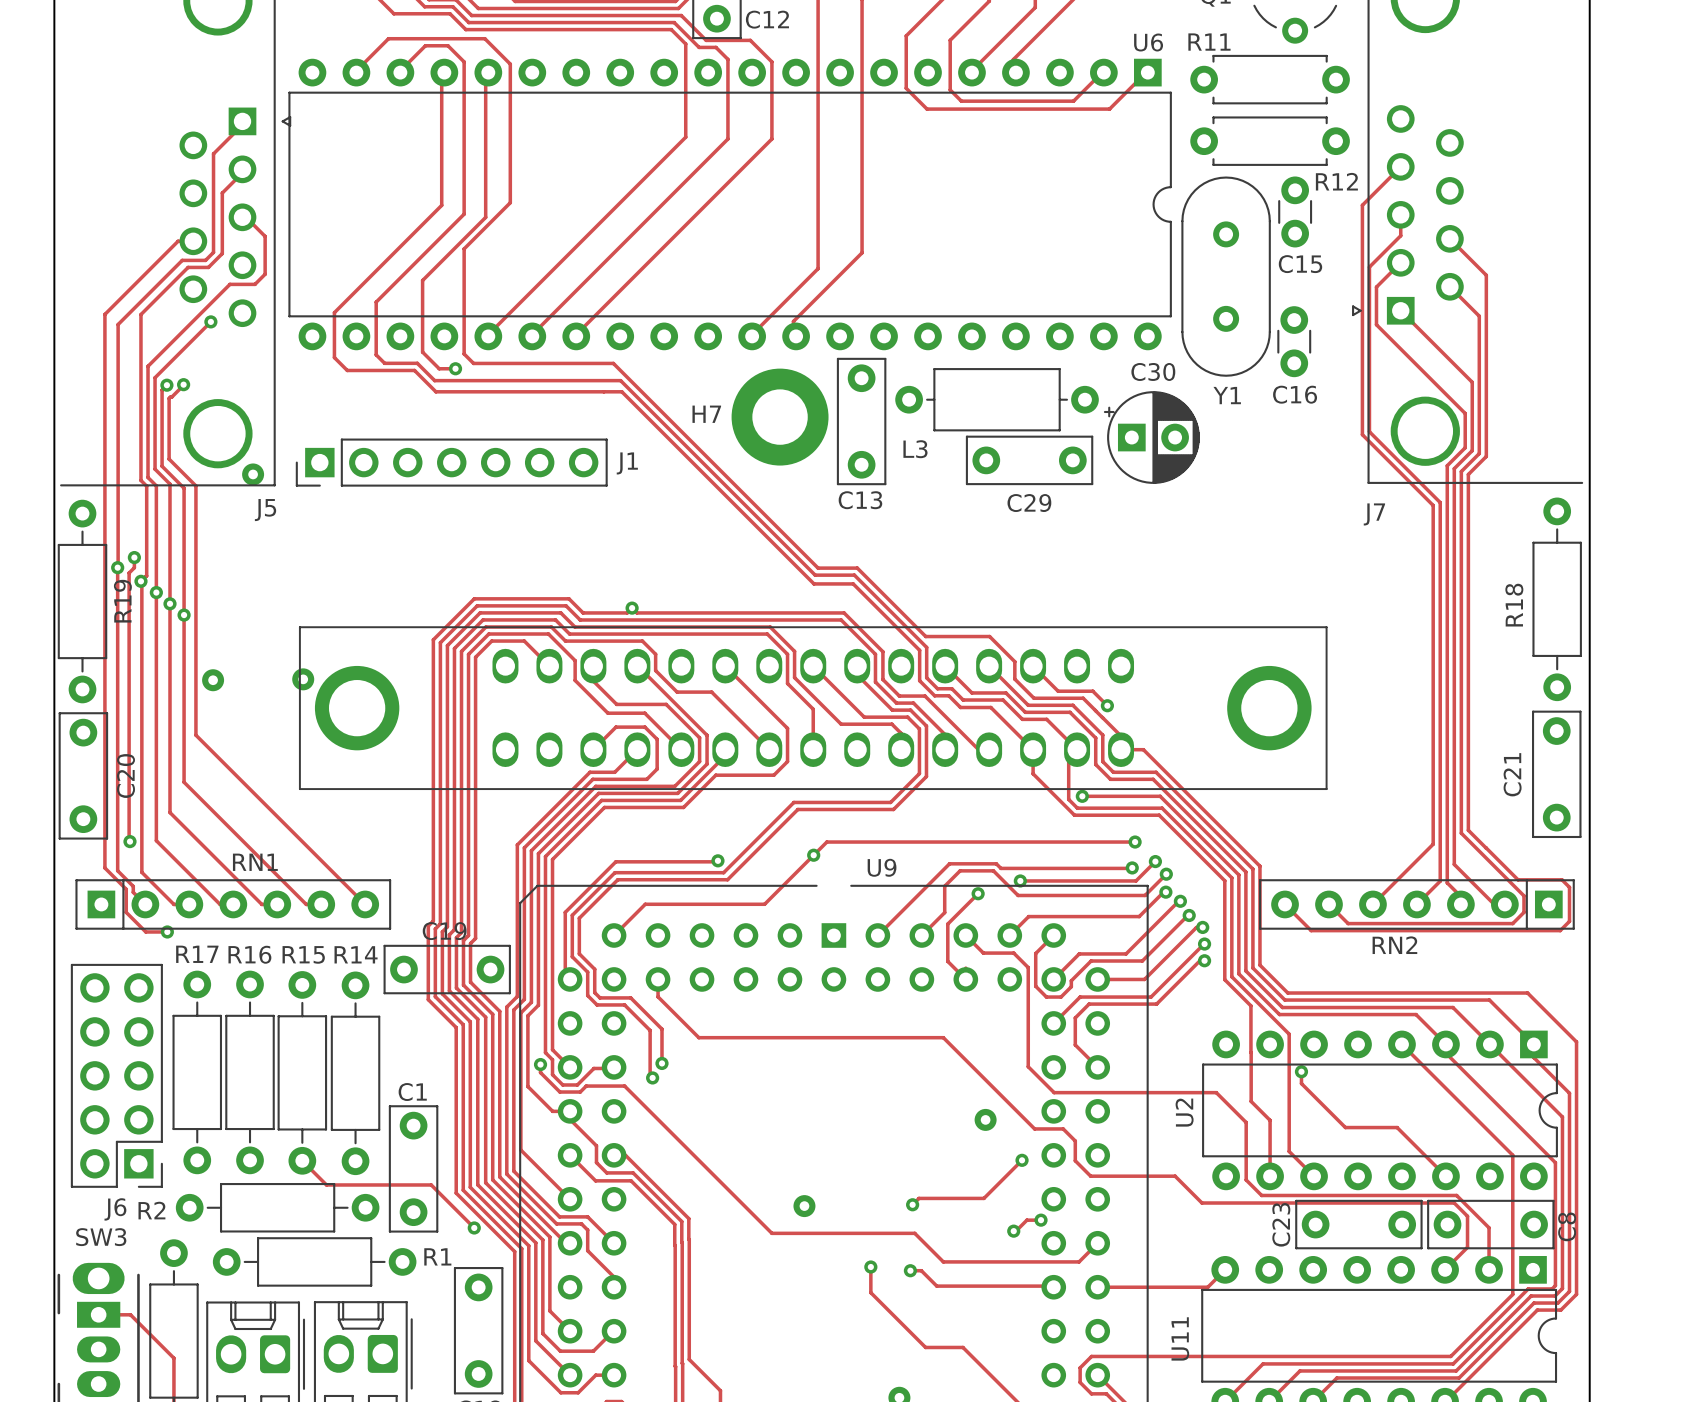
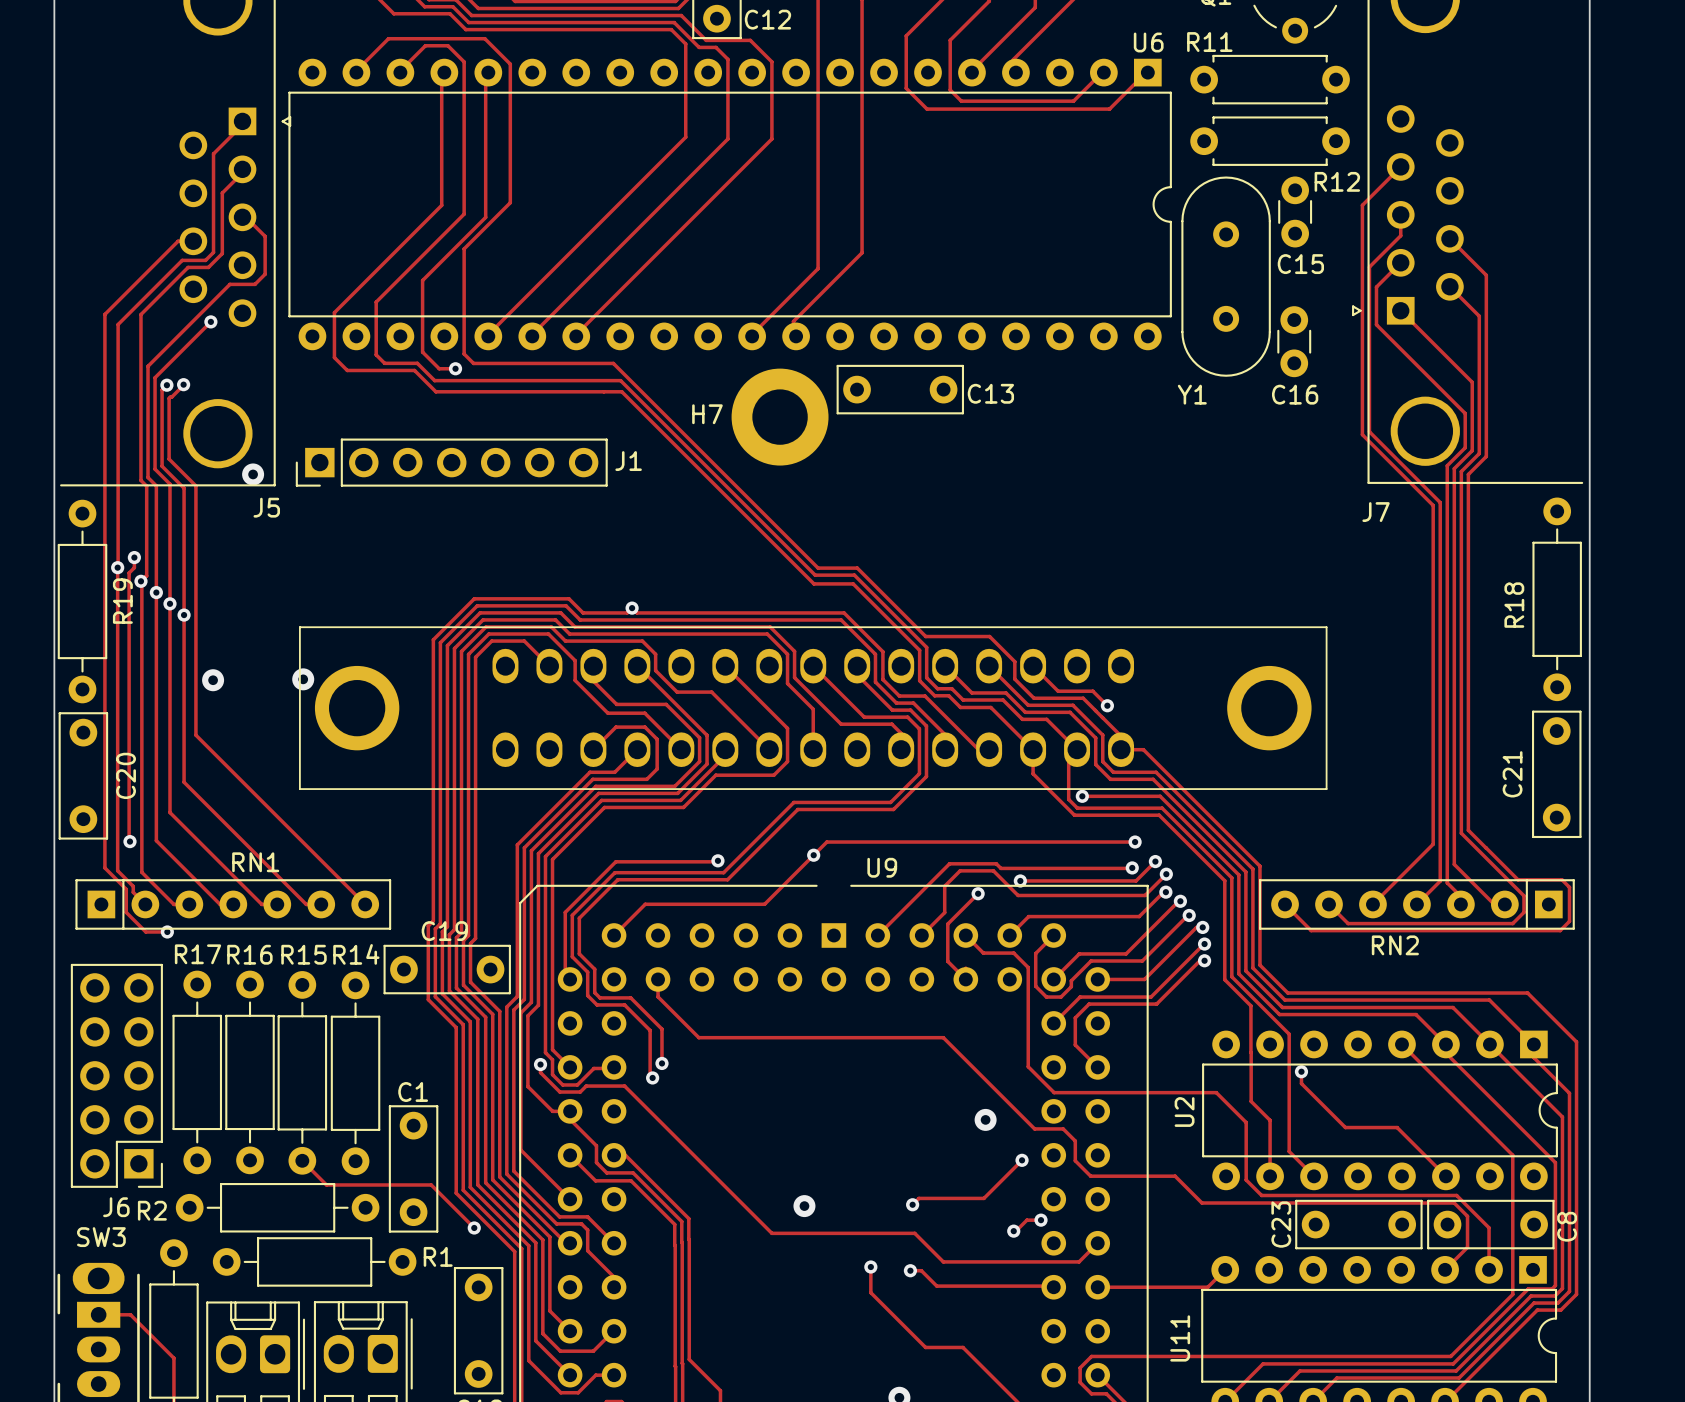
Y1 name position: Y1 (1227, 395) -> Y1 (1192, 394)
L3: (997, 399) -> none
C13 rotation: 0° (861, 421) -> 90° clockwise (900, 389)
C30: (1151, 437) -> none
C29: (1029, 460) -> none
C13 name position: C13 (860, 500) -> C13 (990, 393)

